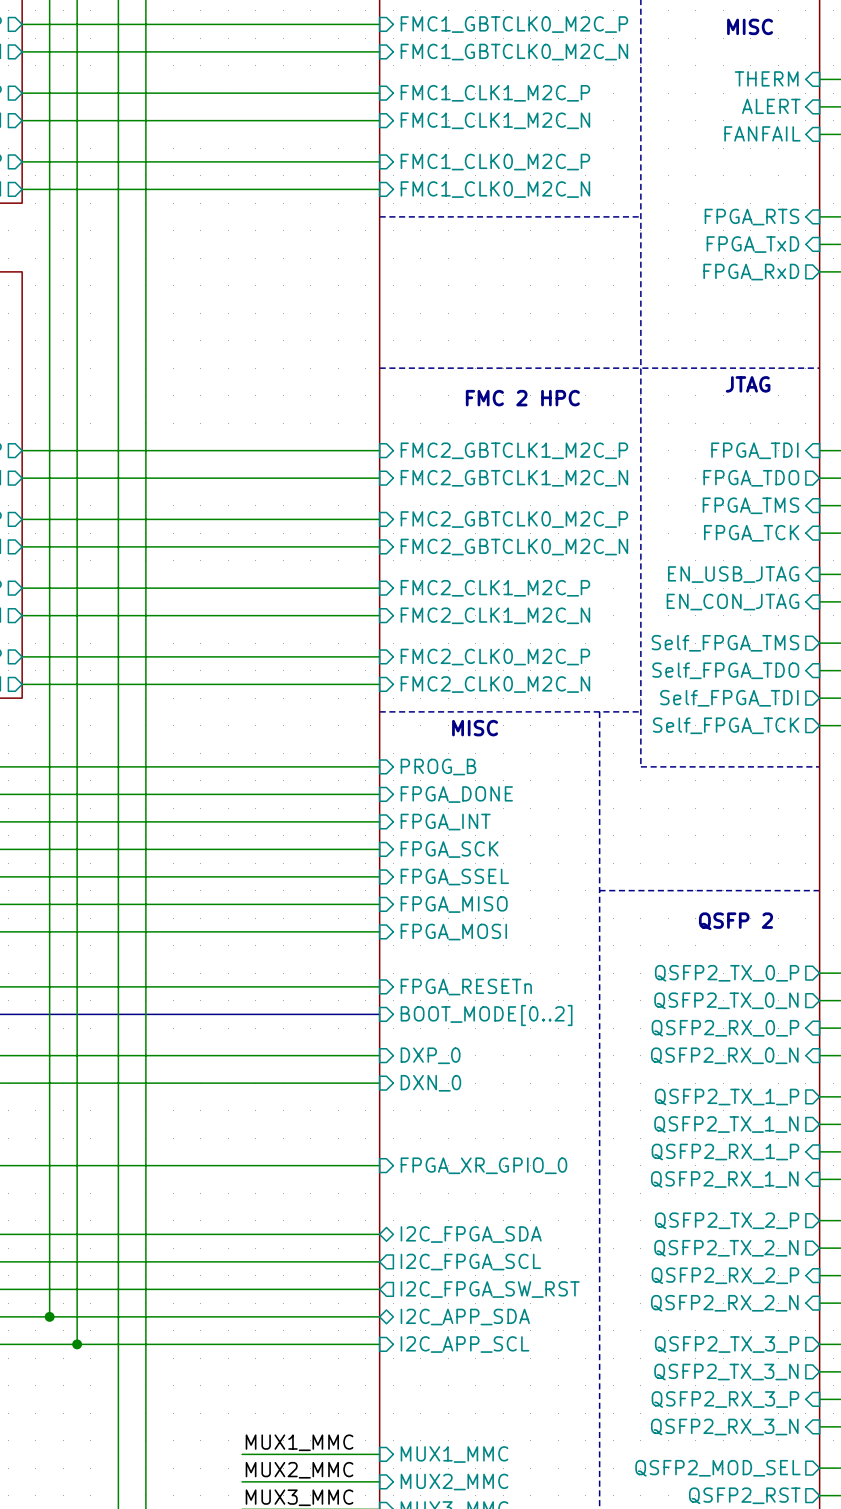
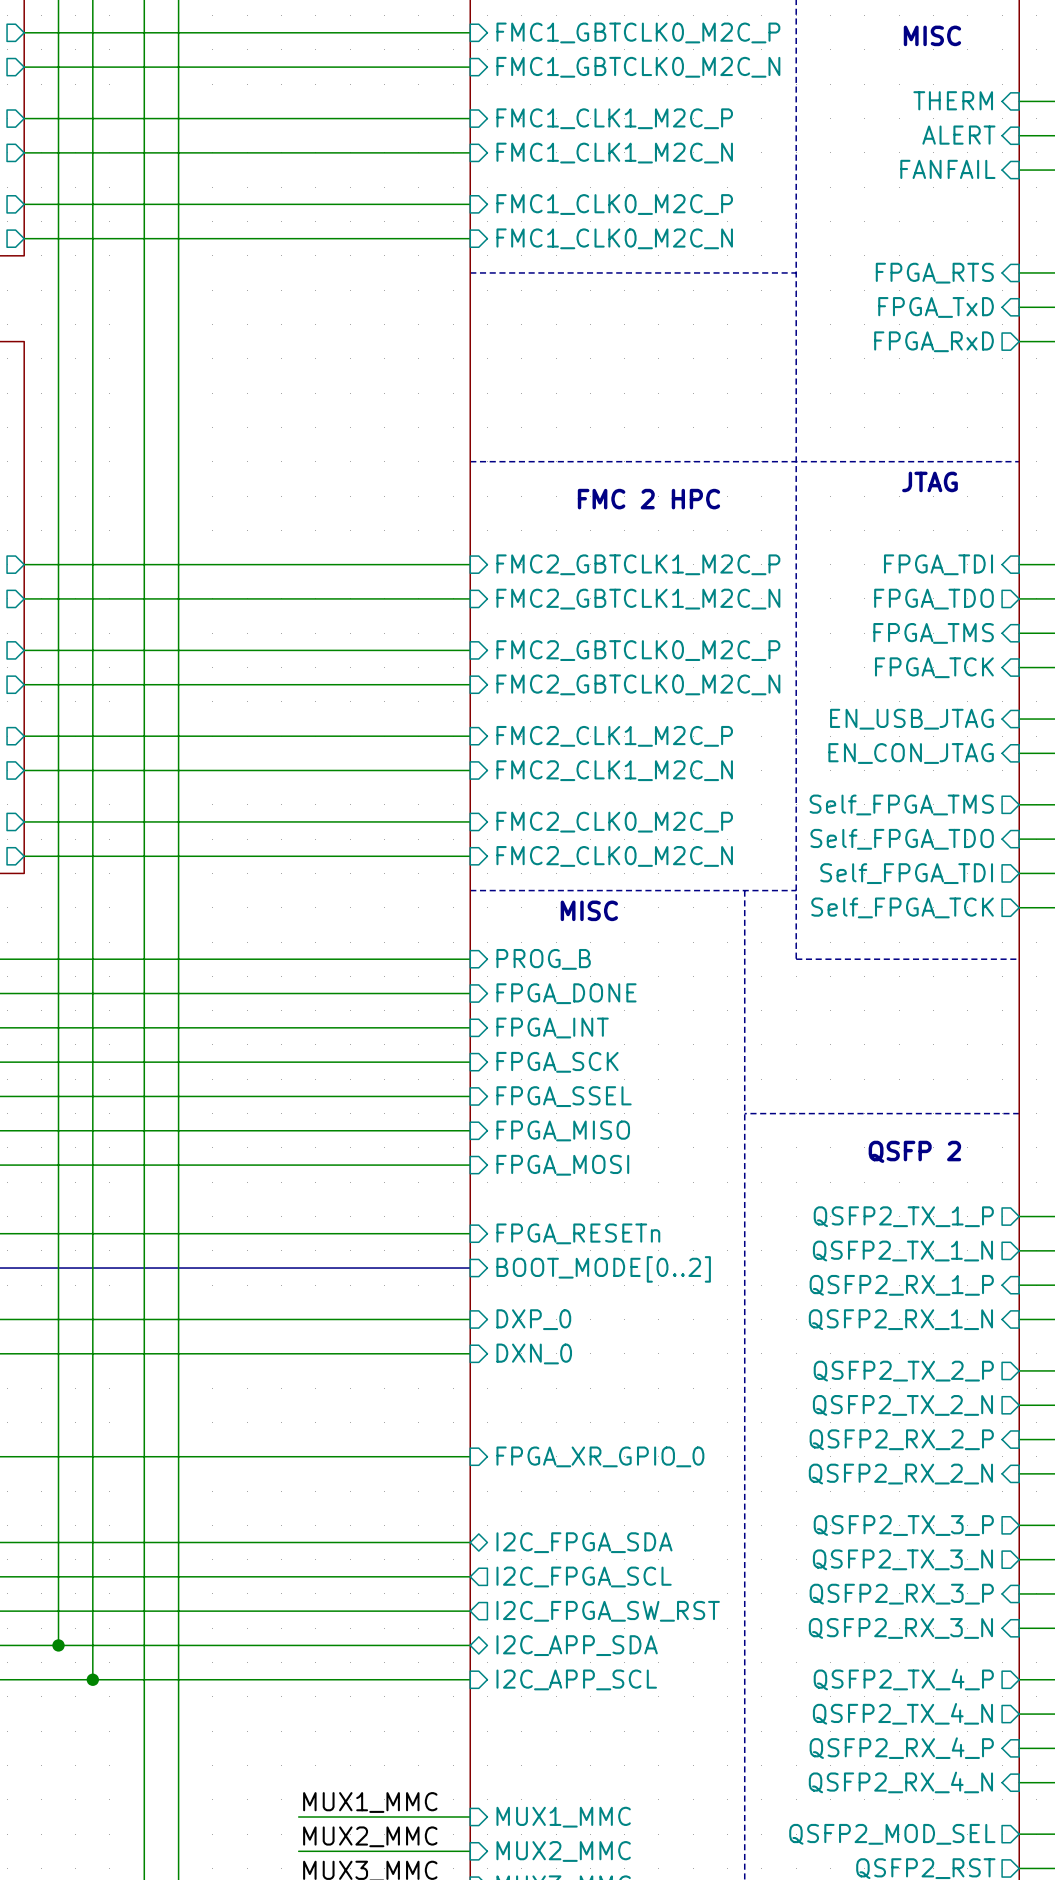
sheet pin: QSFP2_TX_0_P (727, 973) -> QSFP2_TX_1_P (903, 1216)
sheet pin: QSFP2_TX_0_N (726, 1000) -> QSFP2_TX_1_N (902, 1251)
sheet pin: QSFP2_RX_0_P (725, 1028) -> QSFP2_RX_1_P (901, 1285)
sheet pin: QSFP2_RX_0_N (724, 1055) -> QSFP2_RX_1_N (900, 1319)
sheet pin: QSFP2_TX_1_P (727, 1097) -> QSFP2_TX_2_P (903, 1371)
sheet pin: QSFP2_TX_1_N (726, 1124) -> QSFP2_TX_2_N (902, 1405)
sheet pin: QSFP2_RX_1_P (725, 1152) -> QSFP2_RX_2_P (901, 1439)
sheet pin: QSFP2_RX_1_N (724, 1179) -> QSFP2_RX_2_N (900, 1474)
sheet pin: QSFP2_TX_2_P (727, 1220) -> QSFP2_TX_3_P (903, 1525)
sheet pin: QSFP2_TX_2_N (726, 1248) -> QSFP2_TX_3_N (902, 1559)
sheet pin: QSFP2_RX_2_P (725, 1275) -> QSFP2_RX_3_P (901, 1594)
sheet pin: QSFP2_RX_2_N (724, 1303) -> QSFP2_RX_3_N (900, 1628)
sheet pin: QSFP2_TX_3_P (727, 1344) -> QSFP2_TX_4_P (903, 1679)
sheet pin: QSFP2_TX_3_N (726, 1372) -> QSFP2_TX_4_N (902, 1713)
sheet pin: QSFP2_RX_3_P (725, 1399) -> QSFP2_RX_4_P (901, 1748)
sheet pin: QSFP2_RX_3_N (724, 1427) -> QSFP2_RX_4_N (900, 1782)

